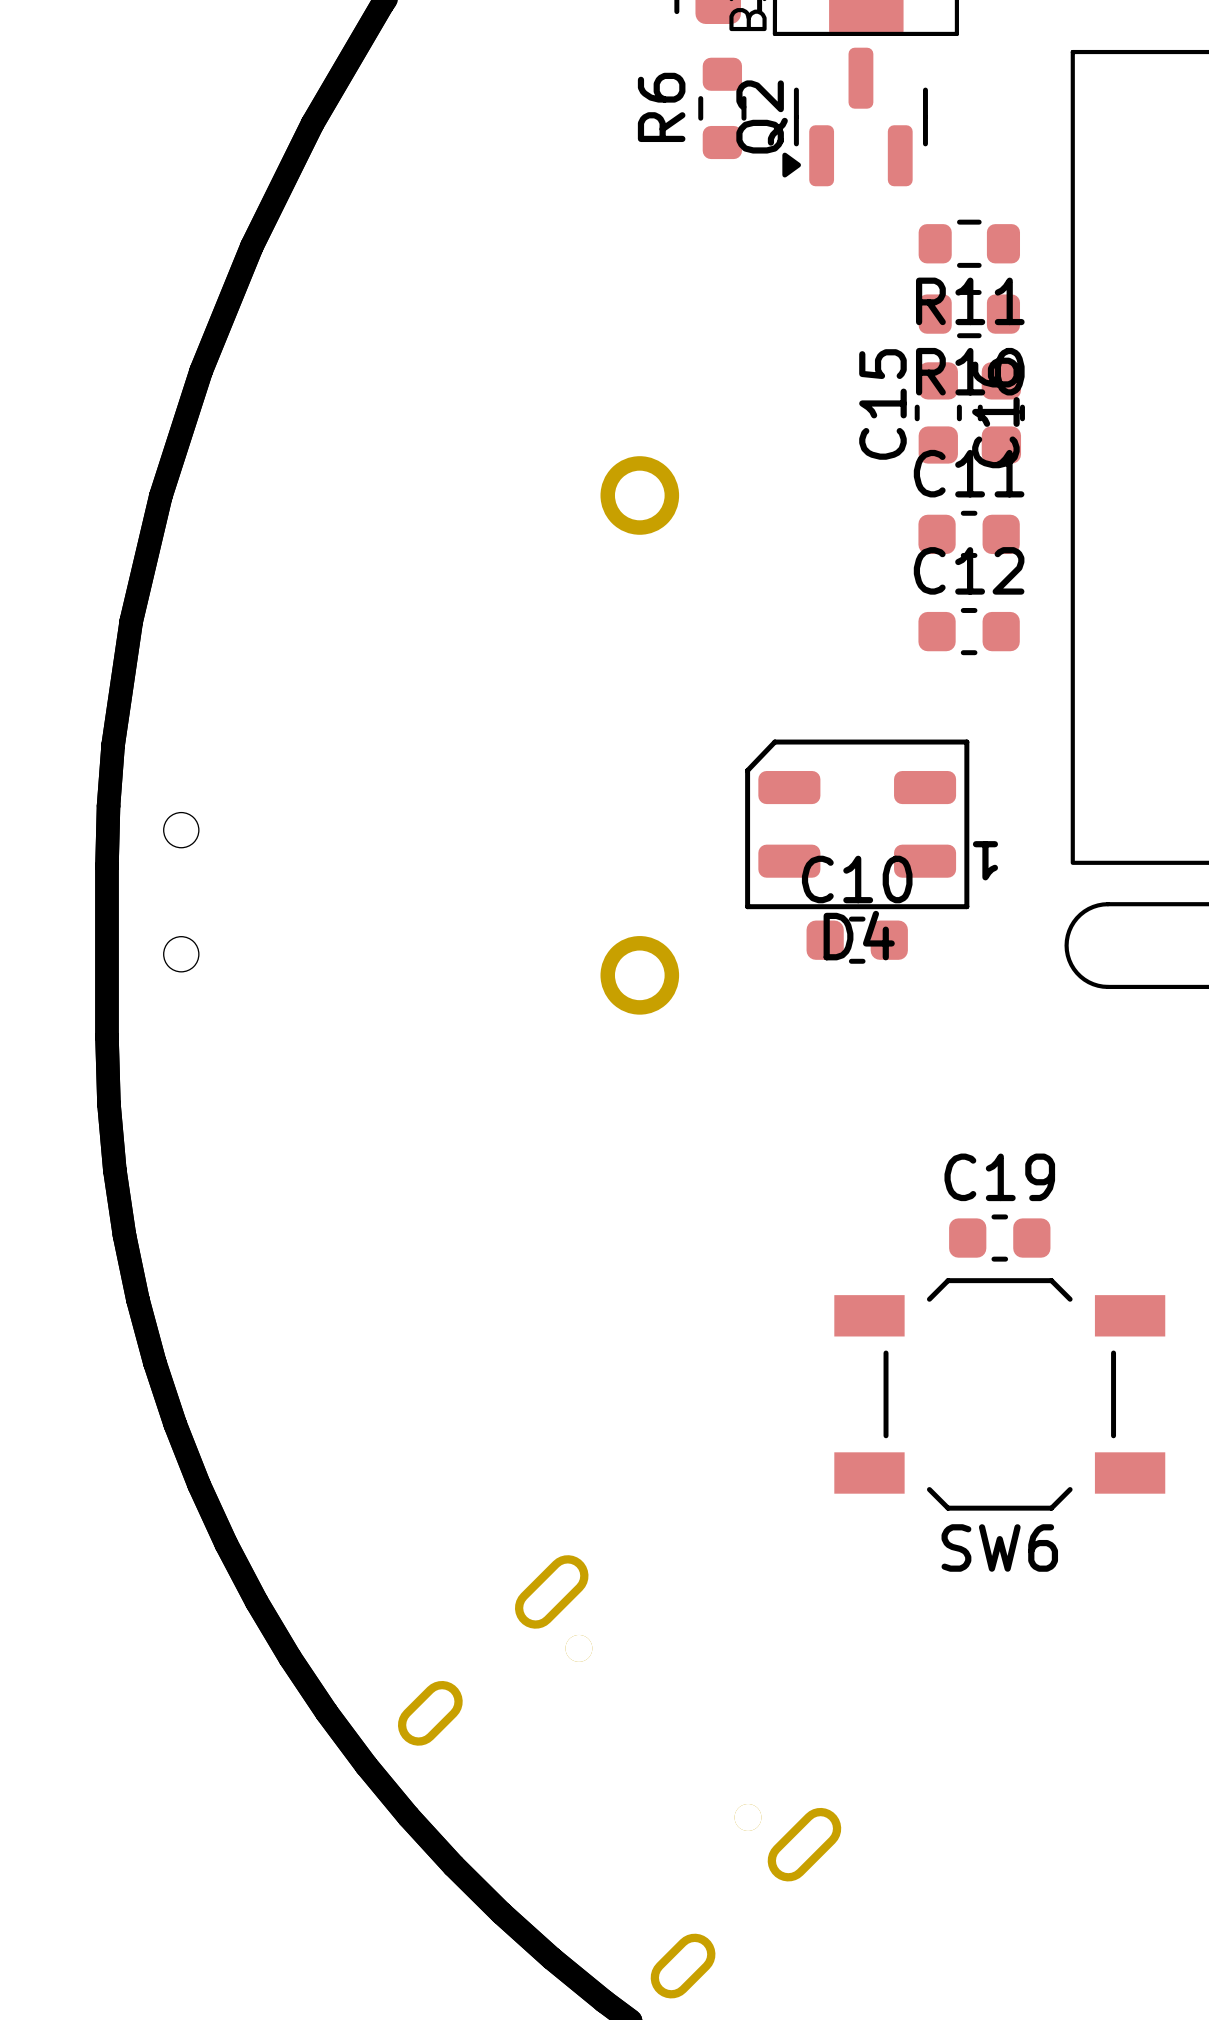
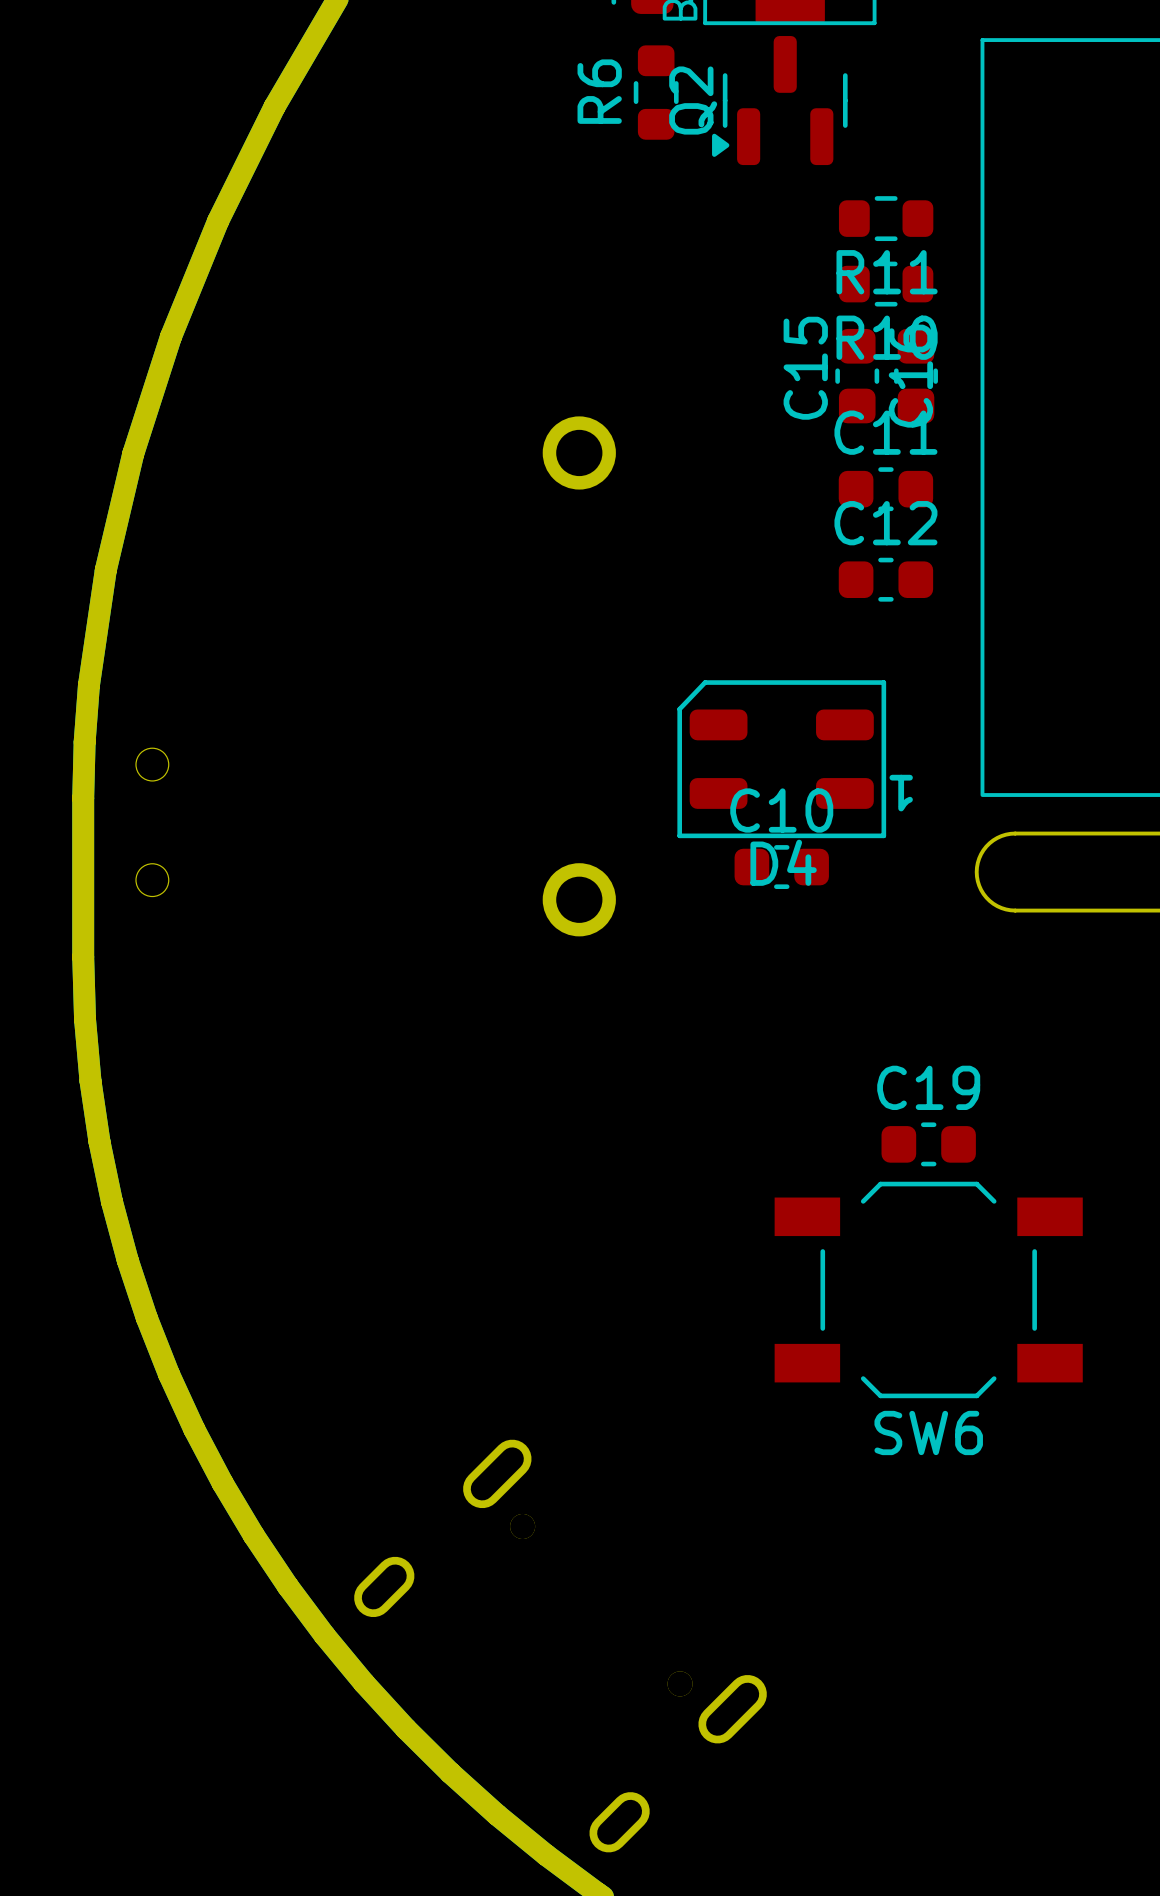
C19 position: (999, 1238) -> (928, 1144)
SW6 position: (999, 1394) -> (928, 1289)

